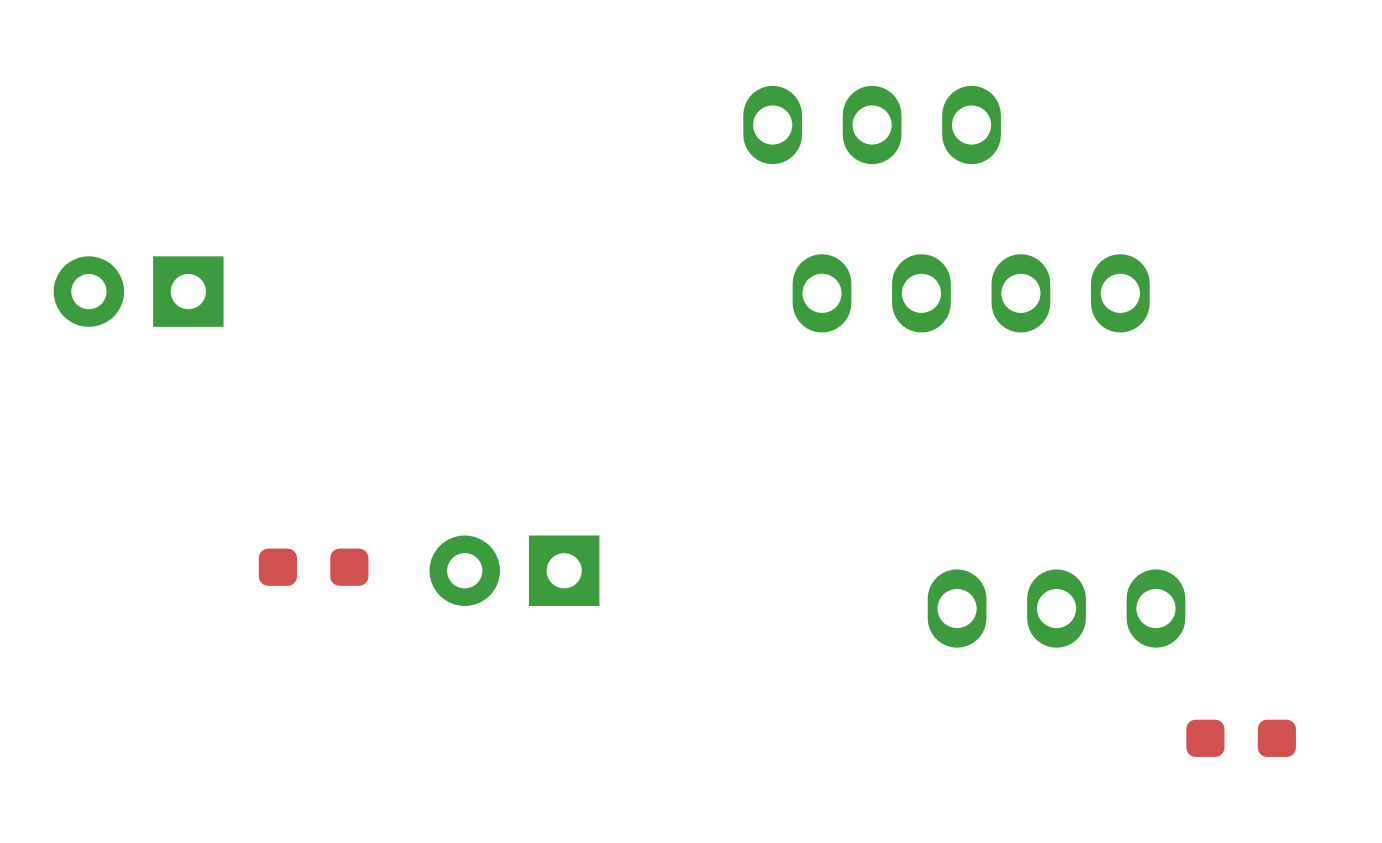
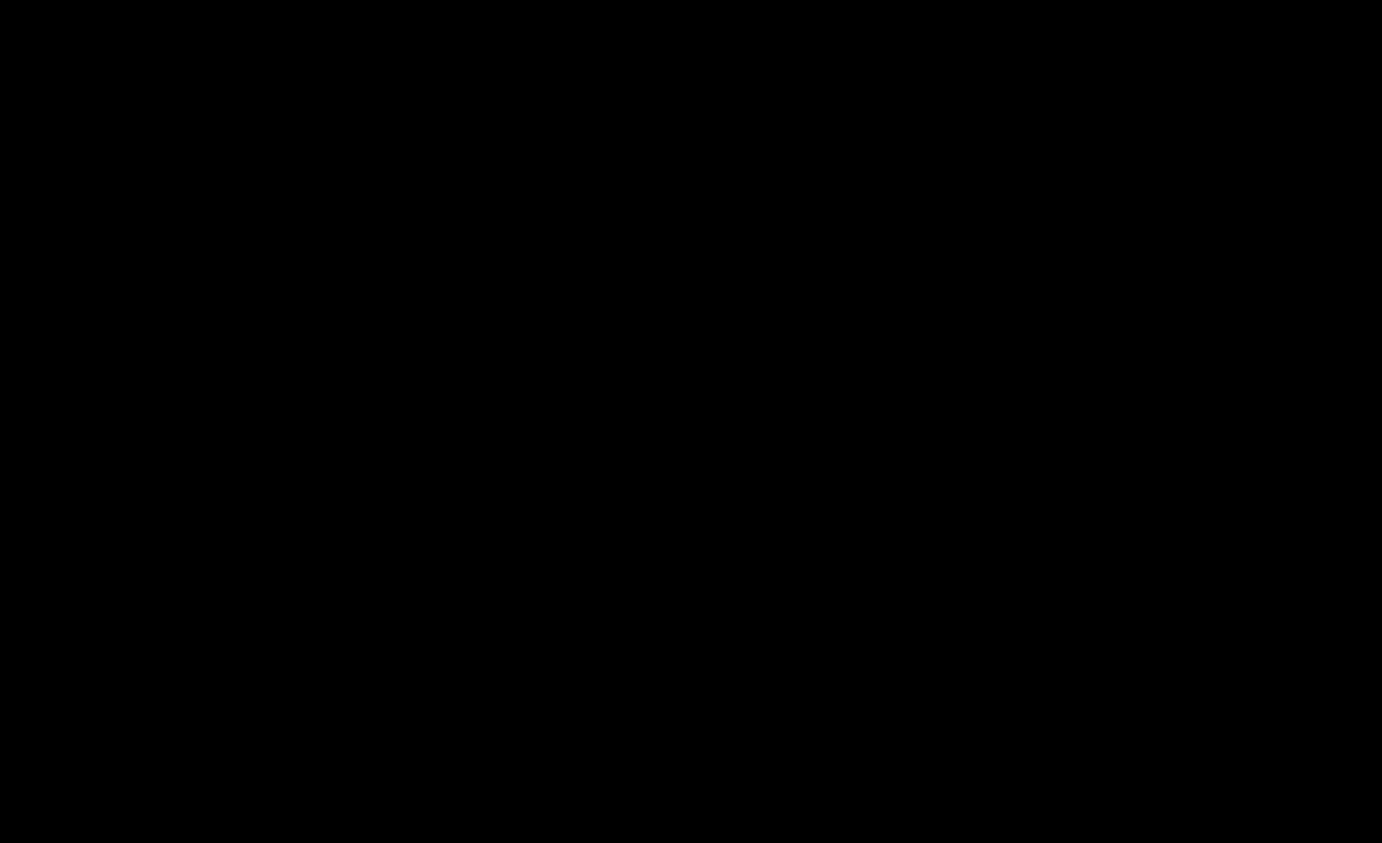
part: (872, 125) -> none
part: (138, 291) -> none
part: (971, 293) -> none
part: (313, 567) -> none
part: (514, 570) -> none
part: (1056, 608) -> none
part: (1241, 738) -> none

